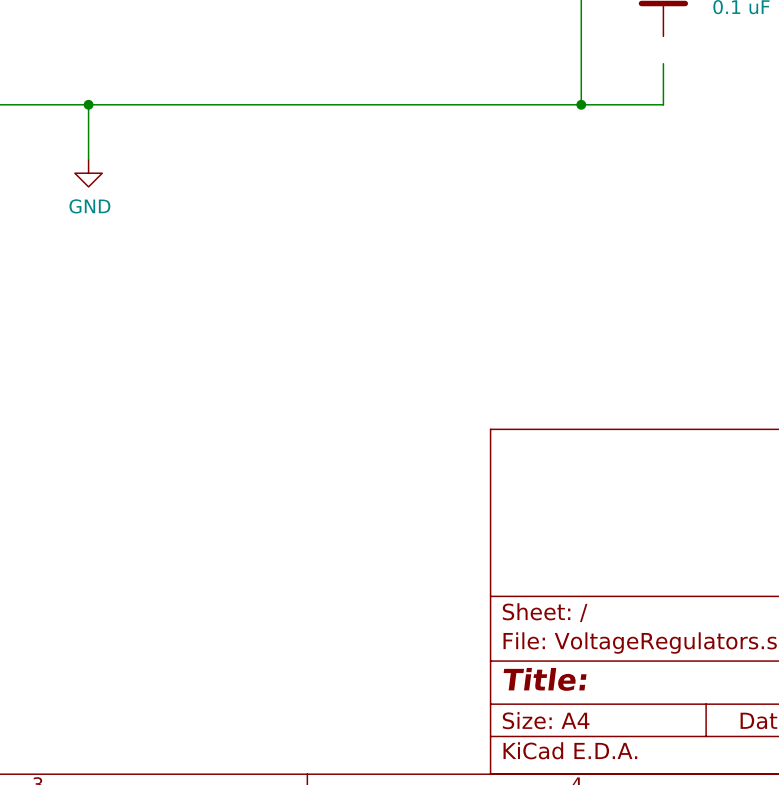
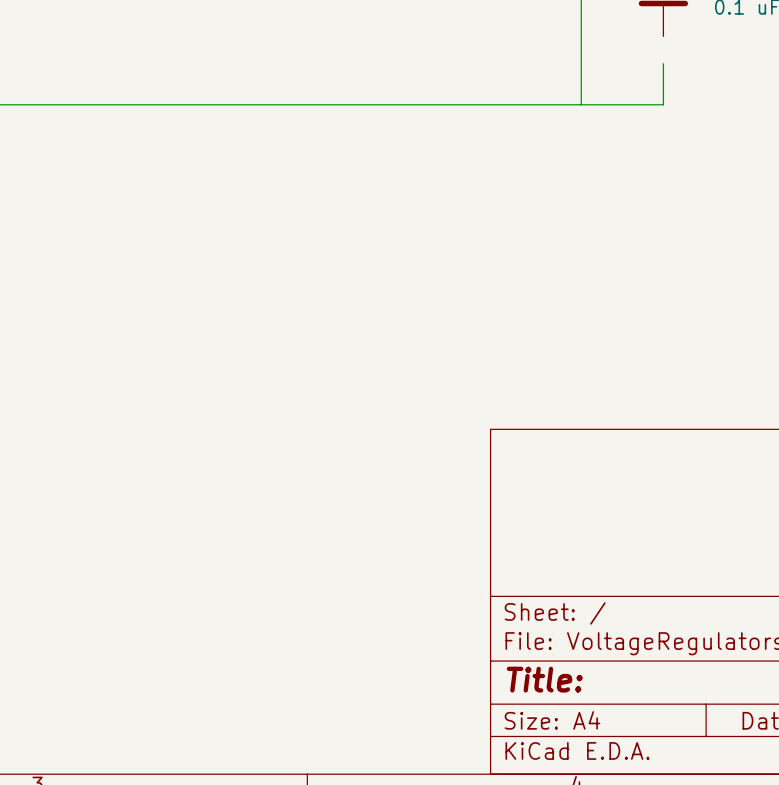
wire: (88, 104) (88, 159) -> none
junction: (88, 104) -> none
junction: (581, 104) -> none
power symbol: GND (88, 173) -> none

